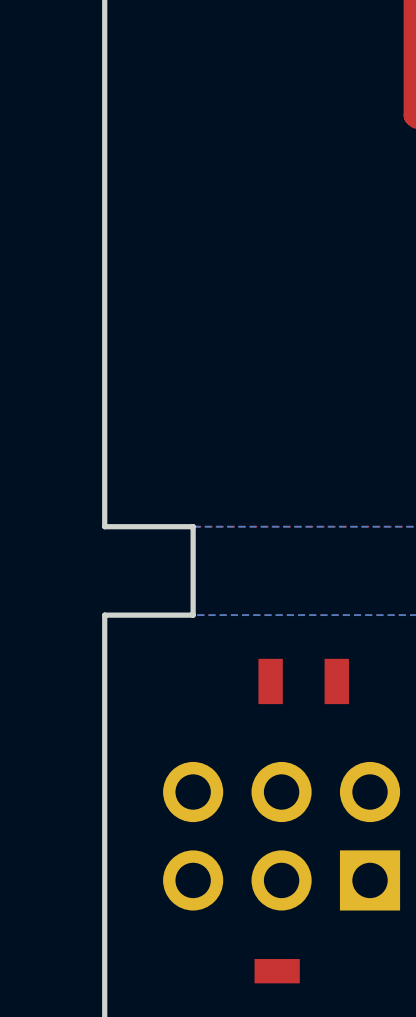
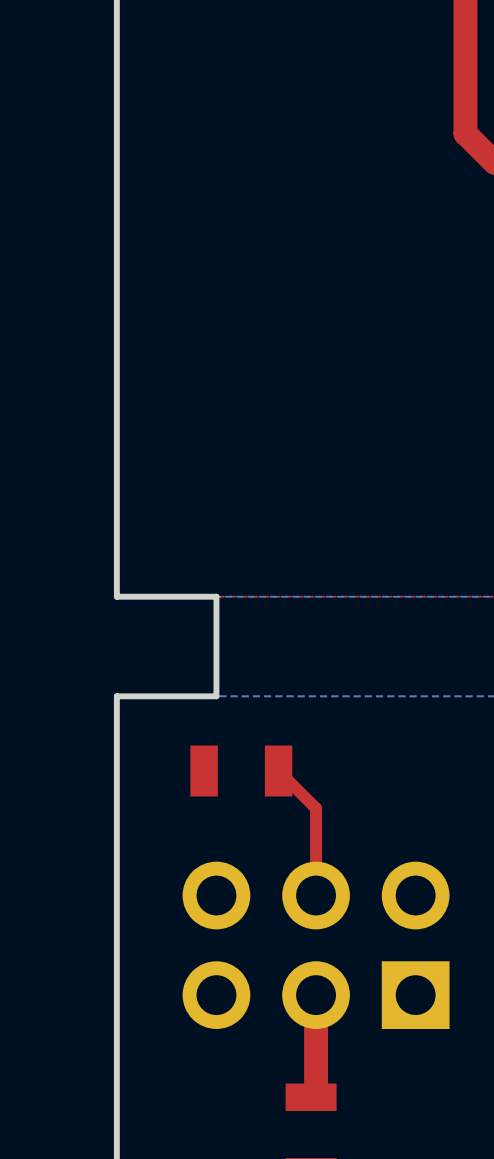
top track: none -> (278, 771) (316, 808) (316, 895)
part position: (303, 681) -> (241, 771)
top track: none -> (316, 995) (316, 1092) (311, 1097)

